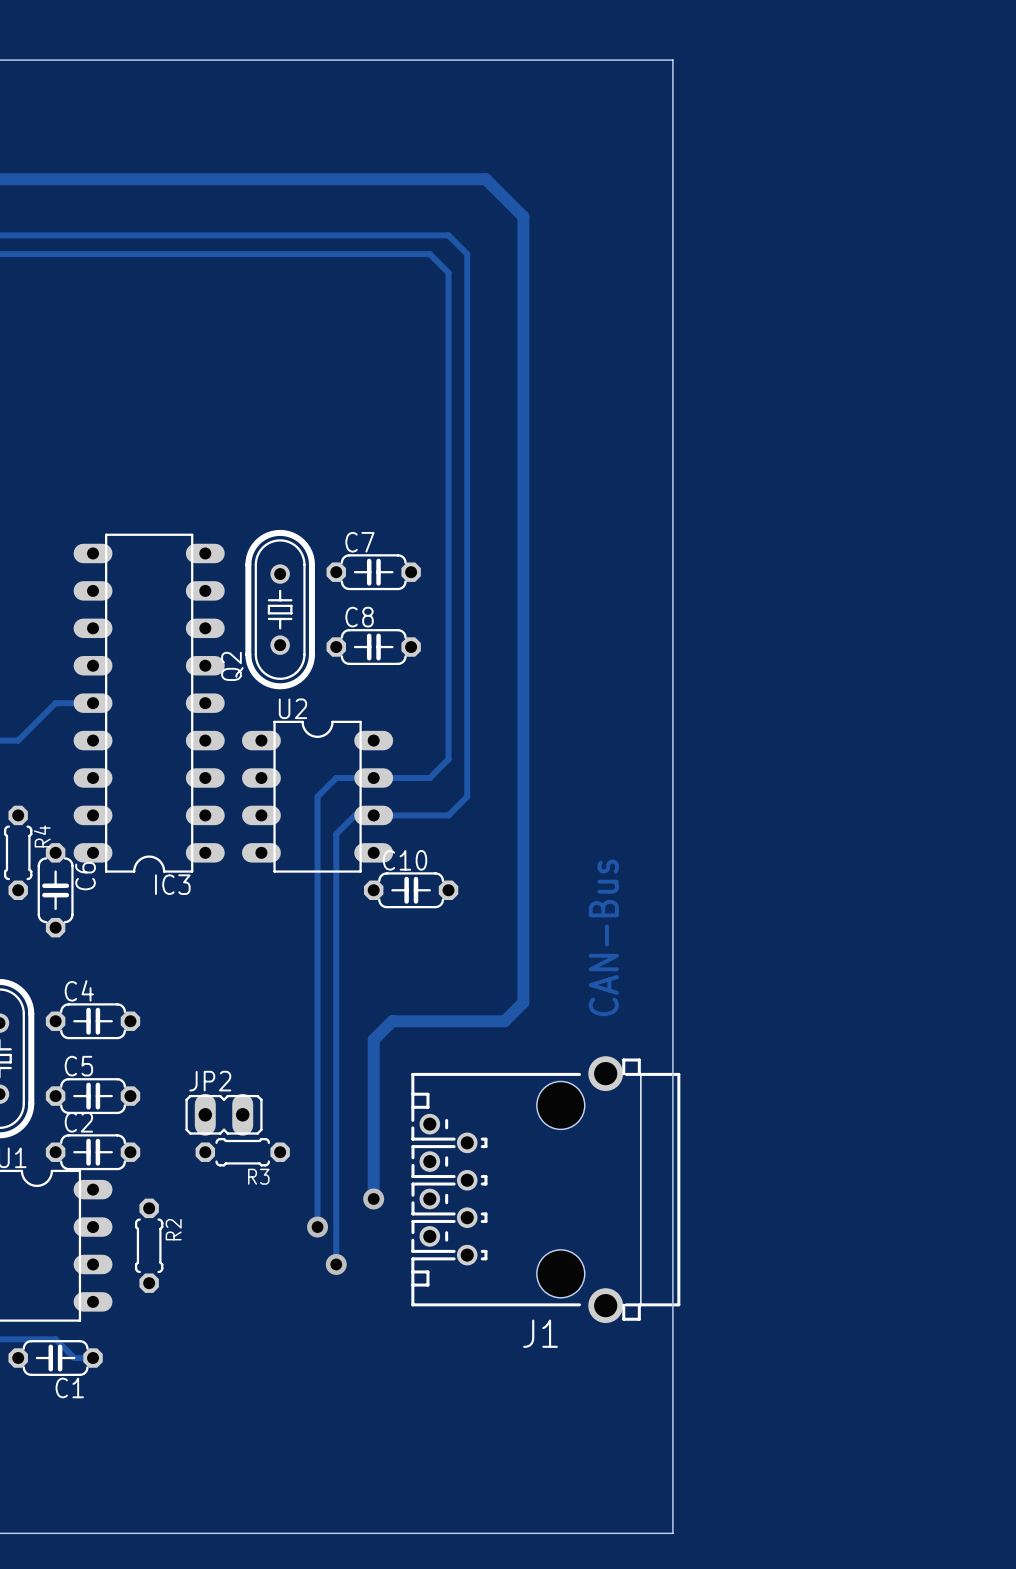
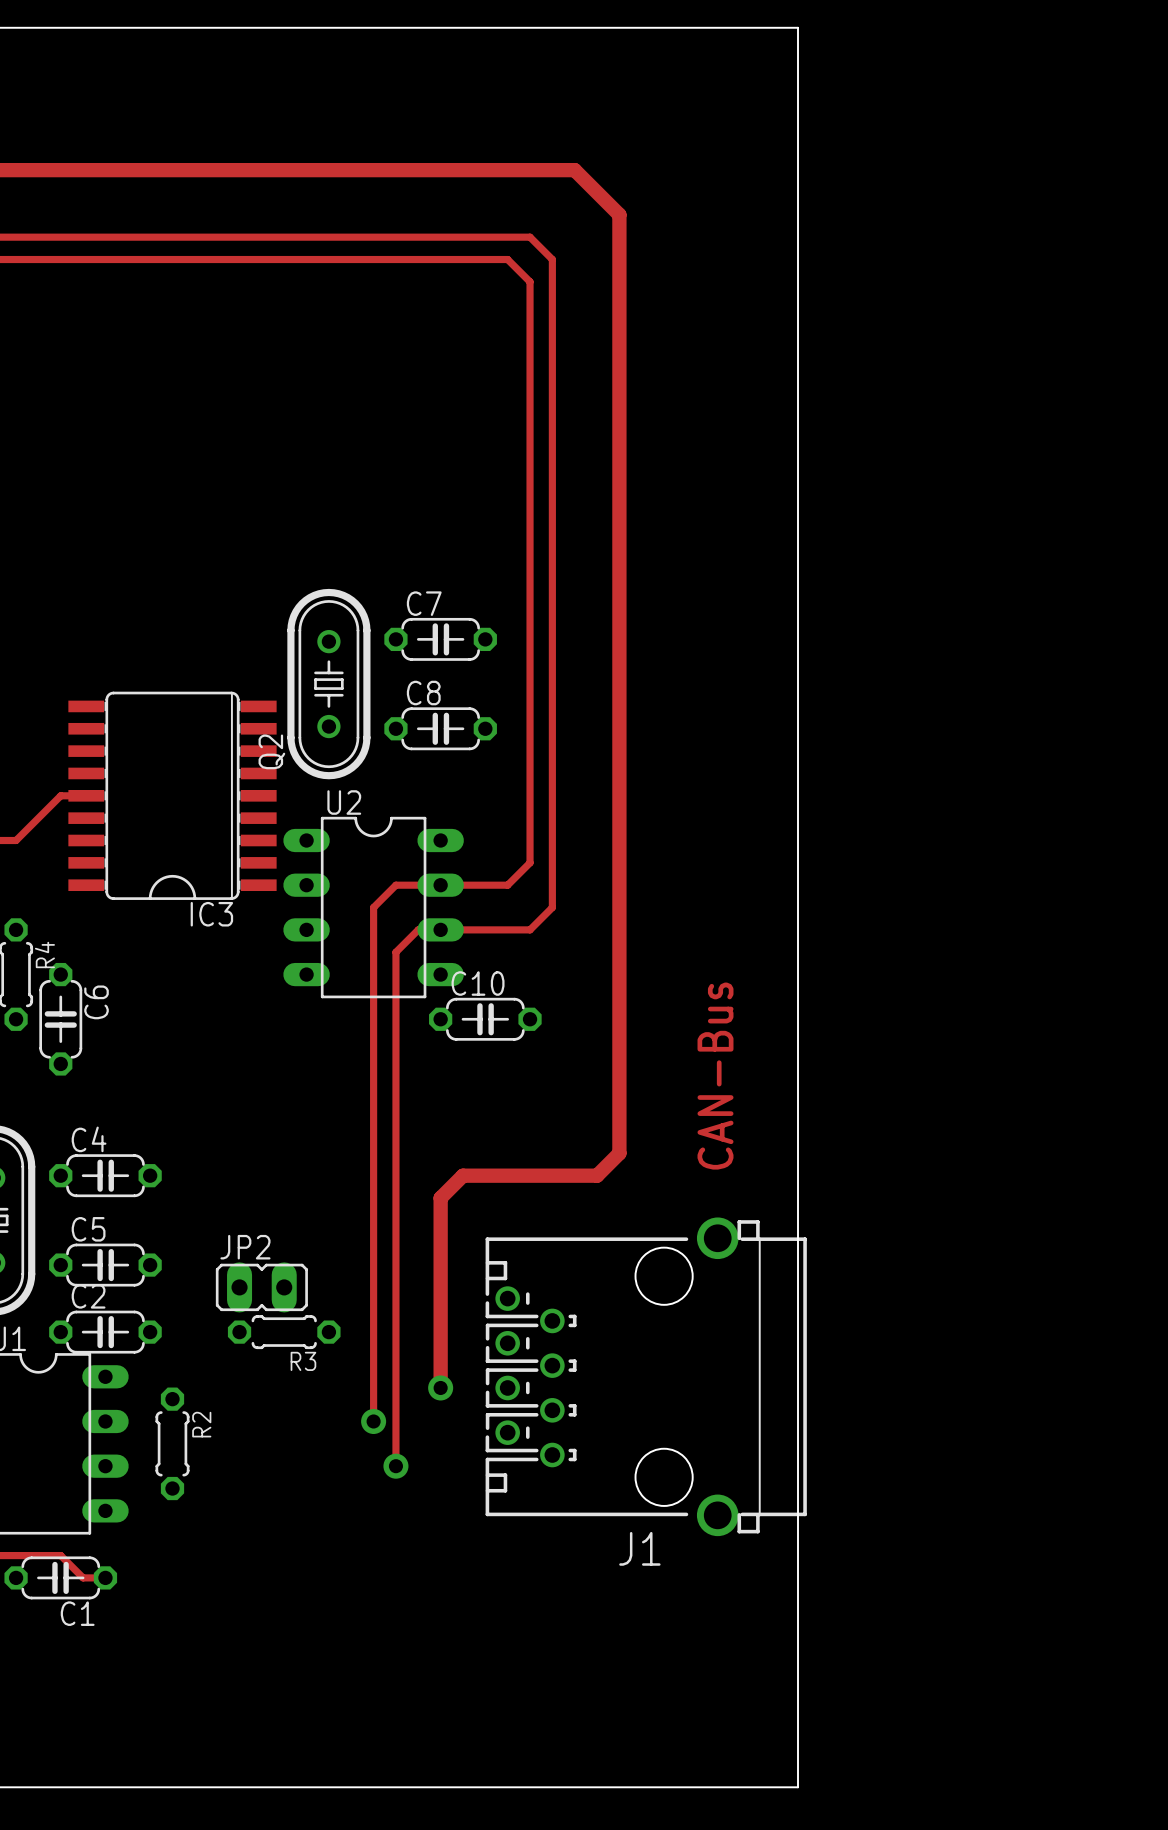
IC3 footprint: [73, 533, 225, 873] -> [68, 691, 277, 900]
IC3 name position: IC3 (172, 884) -> IC3 (211, 914)

